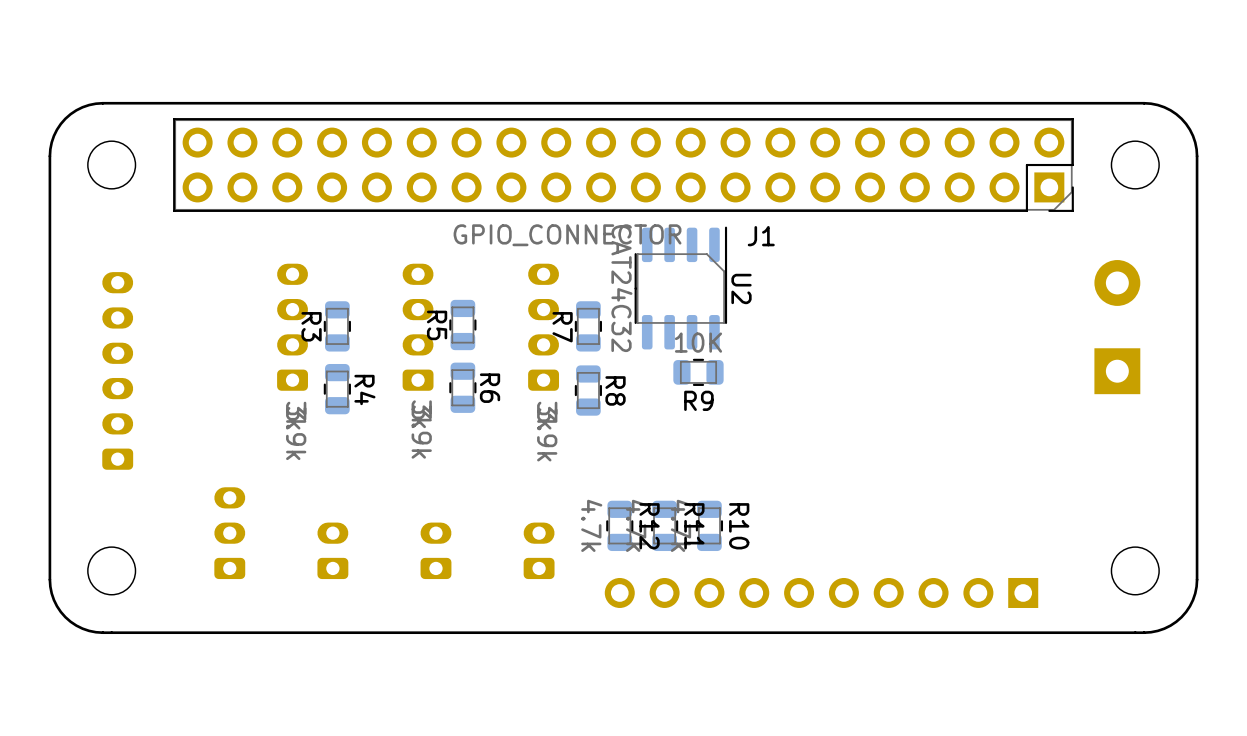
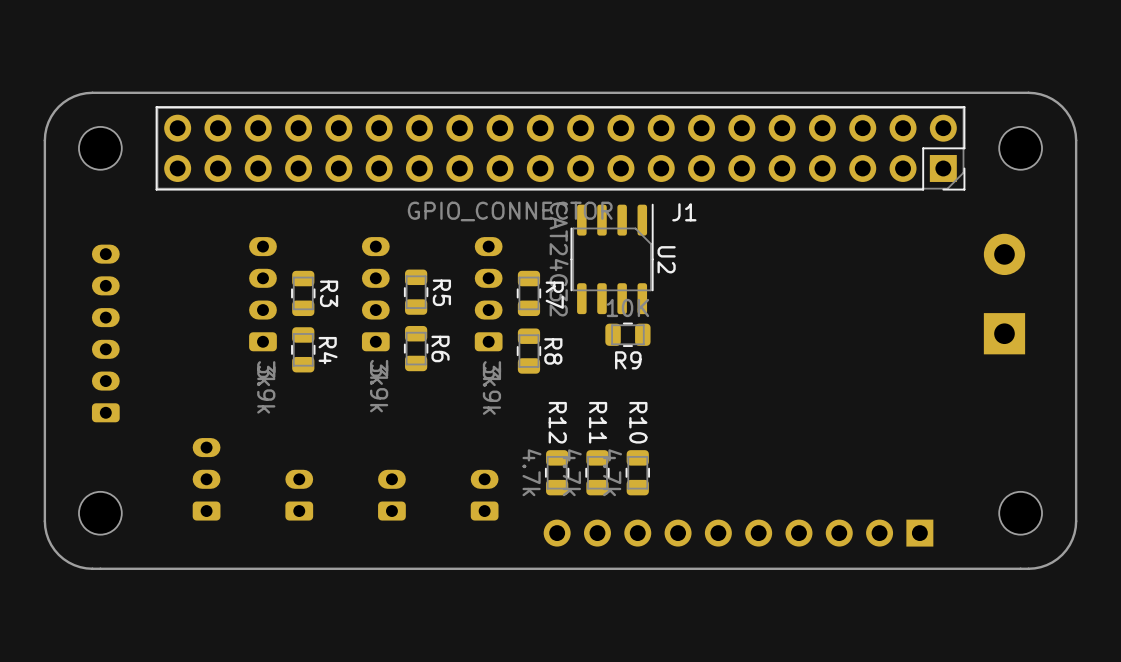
R5 name position: R5 (437, 325) -> R5 (441, 292)
R3 name position: R3 (311, 326) -> R3 (329, 293)
R7 name position: R7 (562, 327) -> R7 (554, 295)
R12 name position: R12 (649, 526) -> R12 (557, 422)
R11 name position: R11 (694, 526) -> R11 (598, 422)
R10 name position: R10 (739, 526) -> R10 (638, 422)

